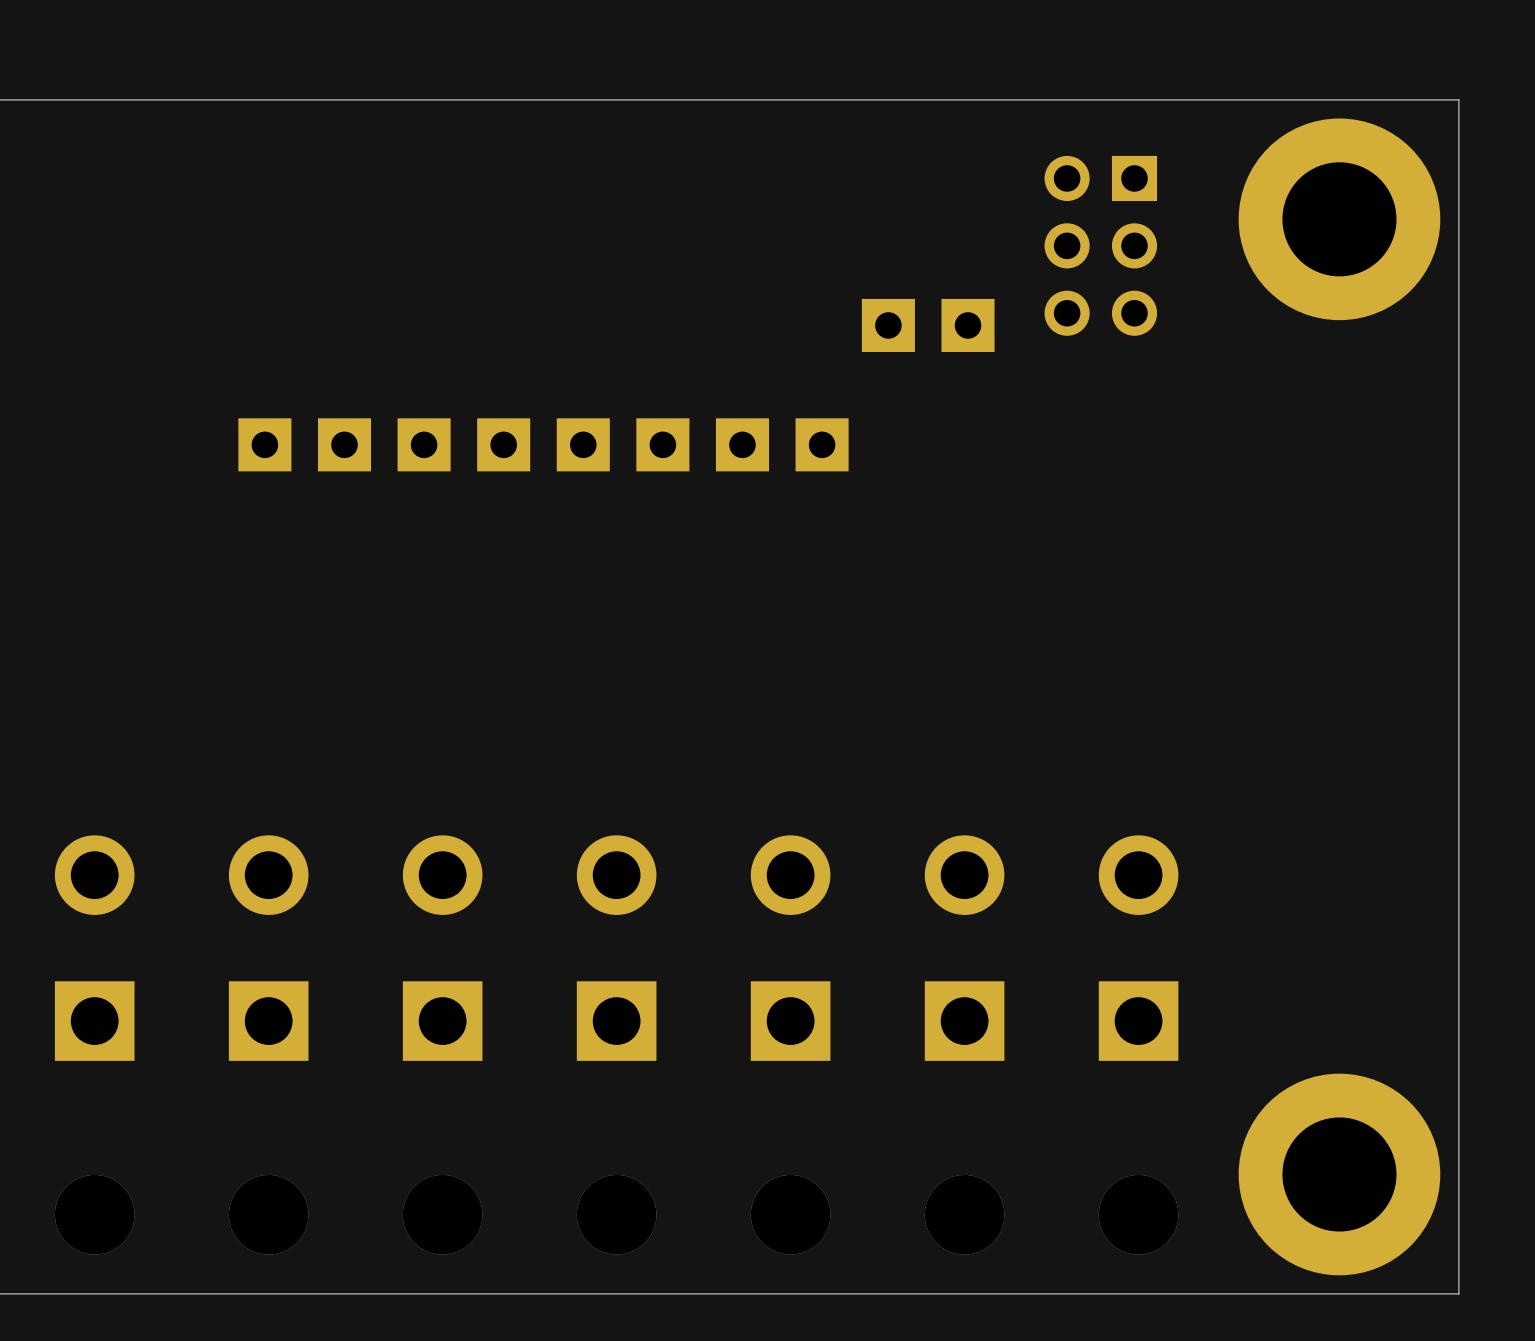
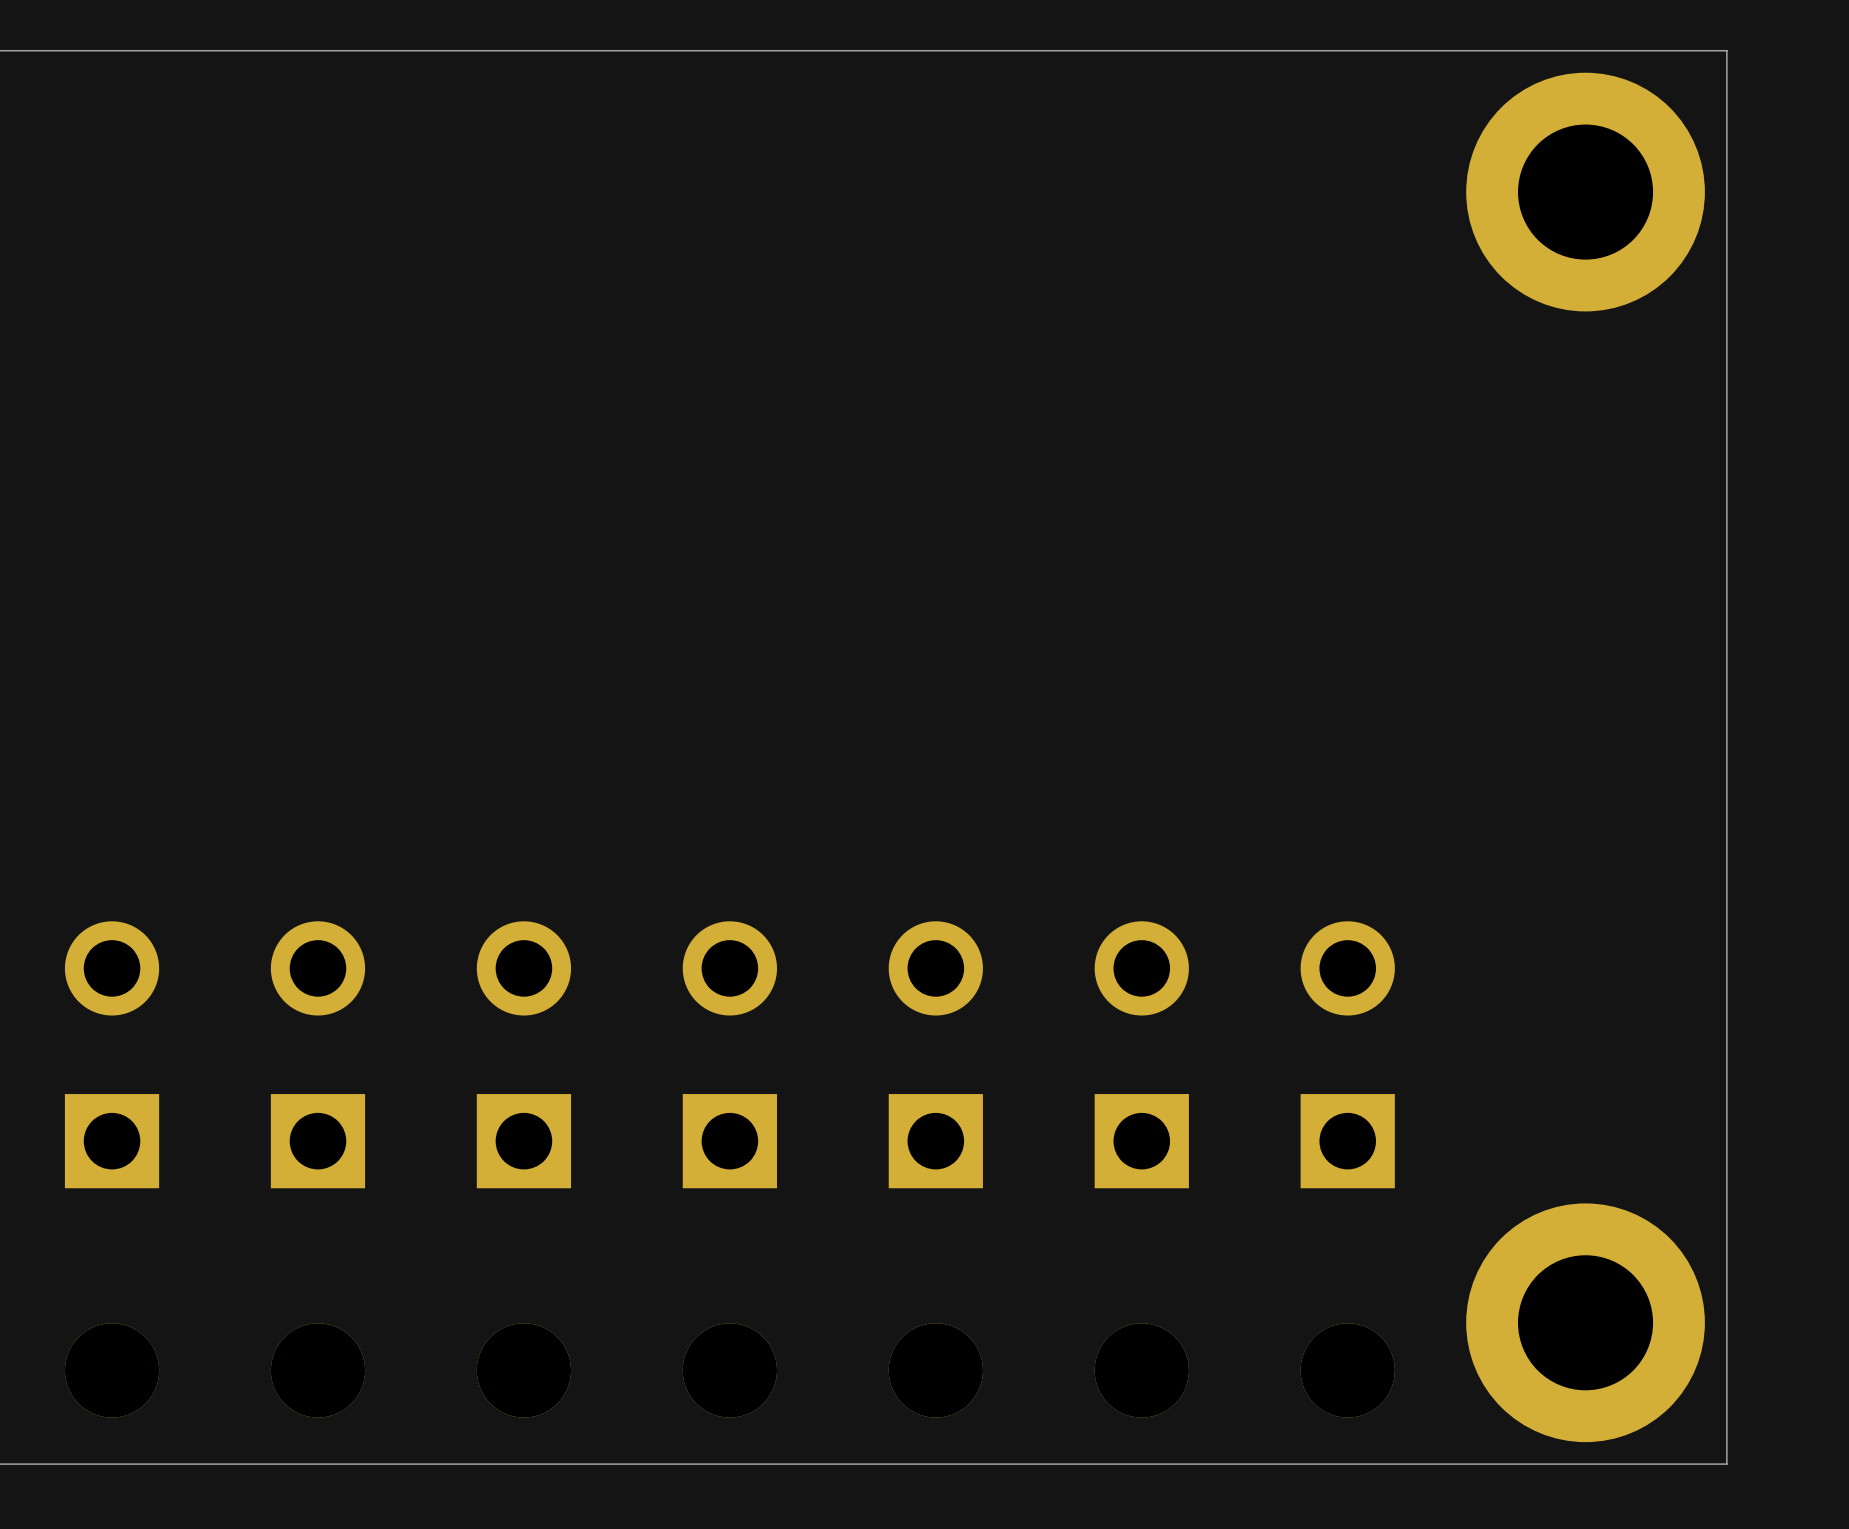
part: (1100, 245) -> none
part: (888, 325) -> none
part: (968, 325) -> none
part: (264, 444) -> none
part: (344, 444) -> none
part: (424, 444) -> none
part: (503, 444) -> none
part: (583, 444) -> none
part: (662, 444) -> none
part: (742, 444) -> none
part: (822, 444) -> none

